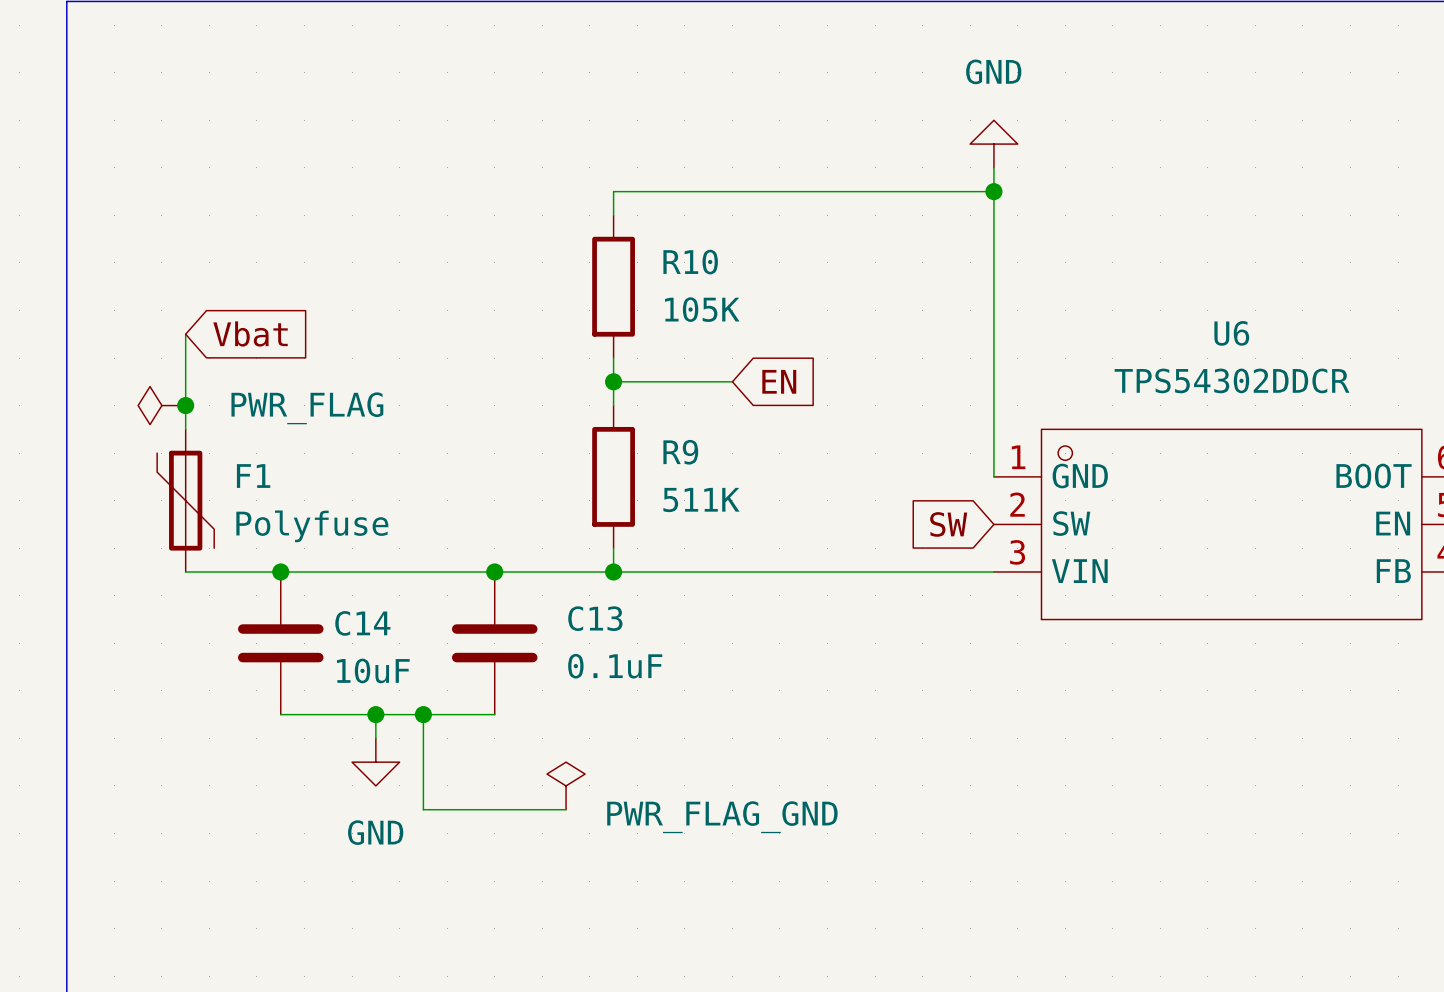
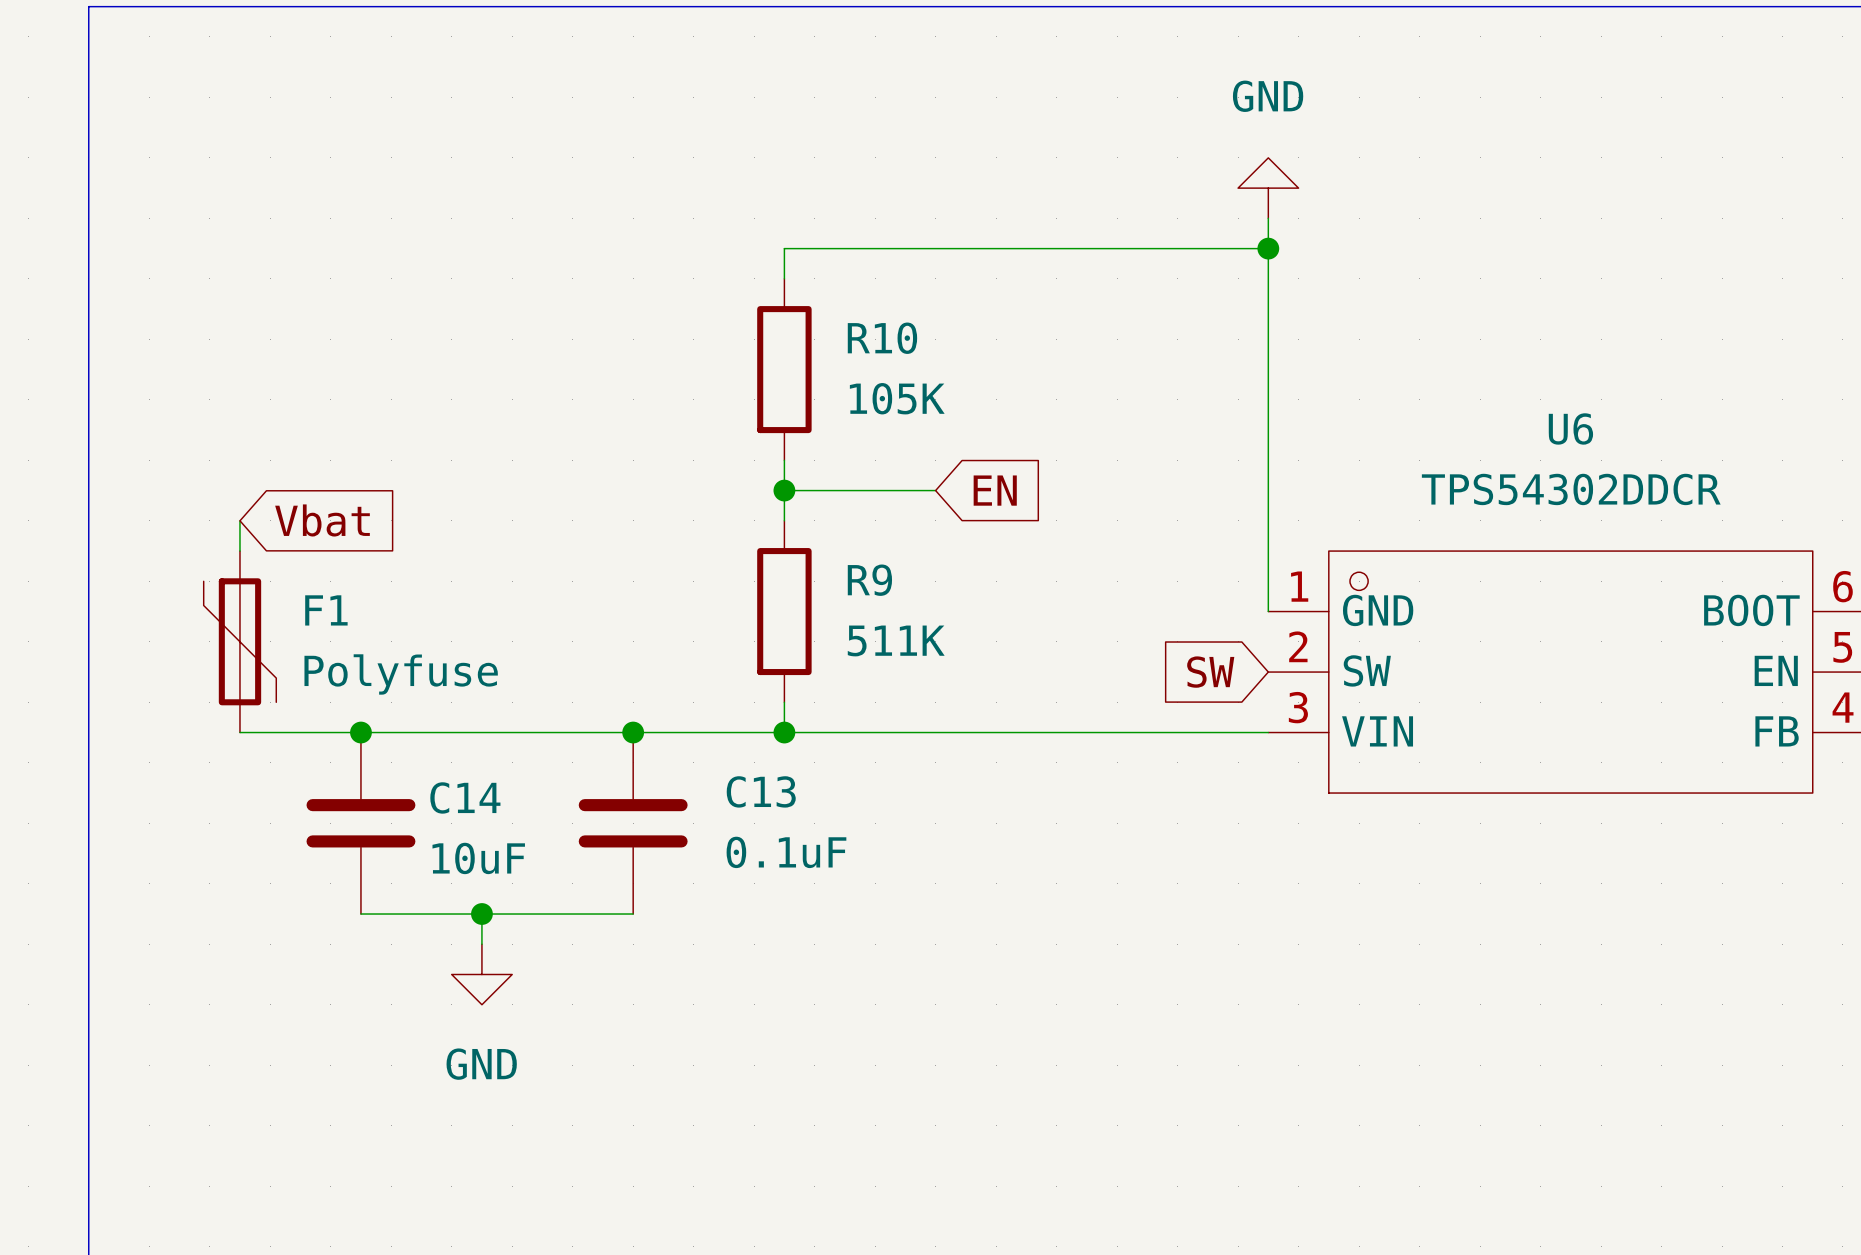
global label position: Vbat (250, 333) -> Vbat (322, 520)
wire: (185, 334) (185, 405) -> none
power symbol: PWR_FLAG (161, 405) -> none
junction: (185, 405) -> none
wire: (423, 714) (423, 809) (566, 809) -> none
junction: (423, 714) -> none
power symbol: PWR_FLAG_GND (566, 785) -> none

